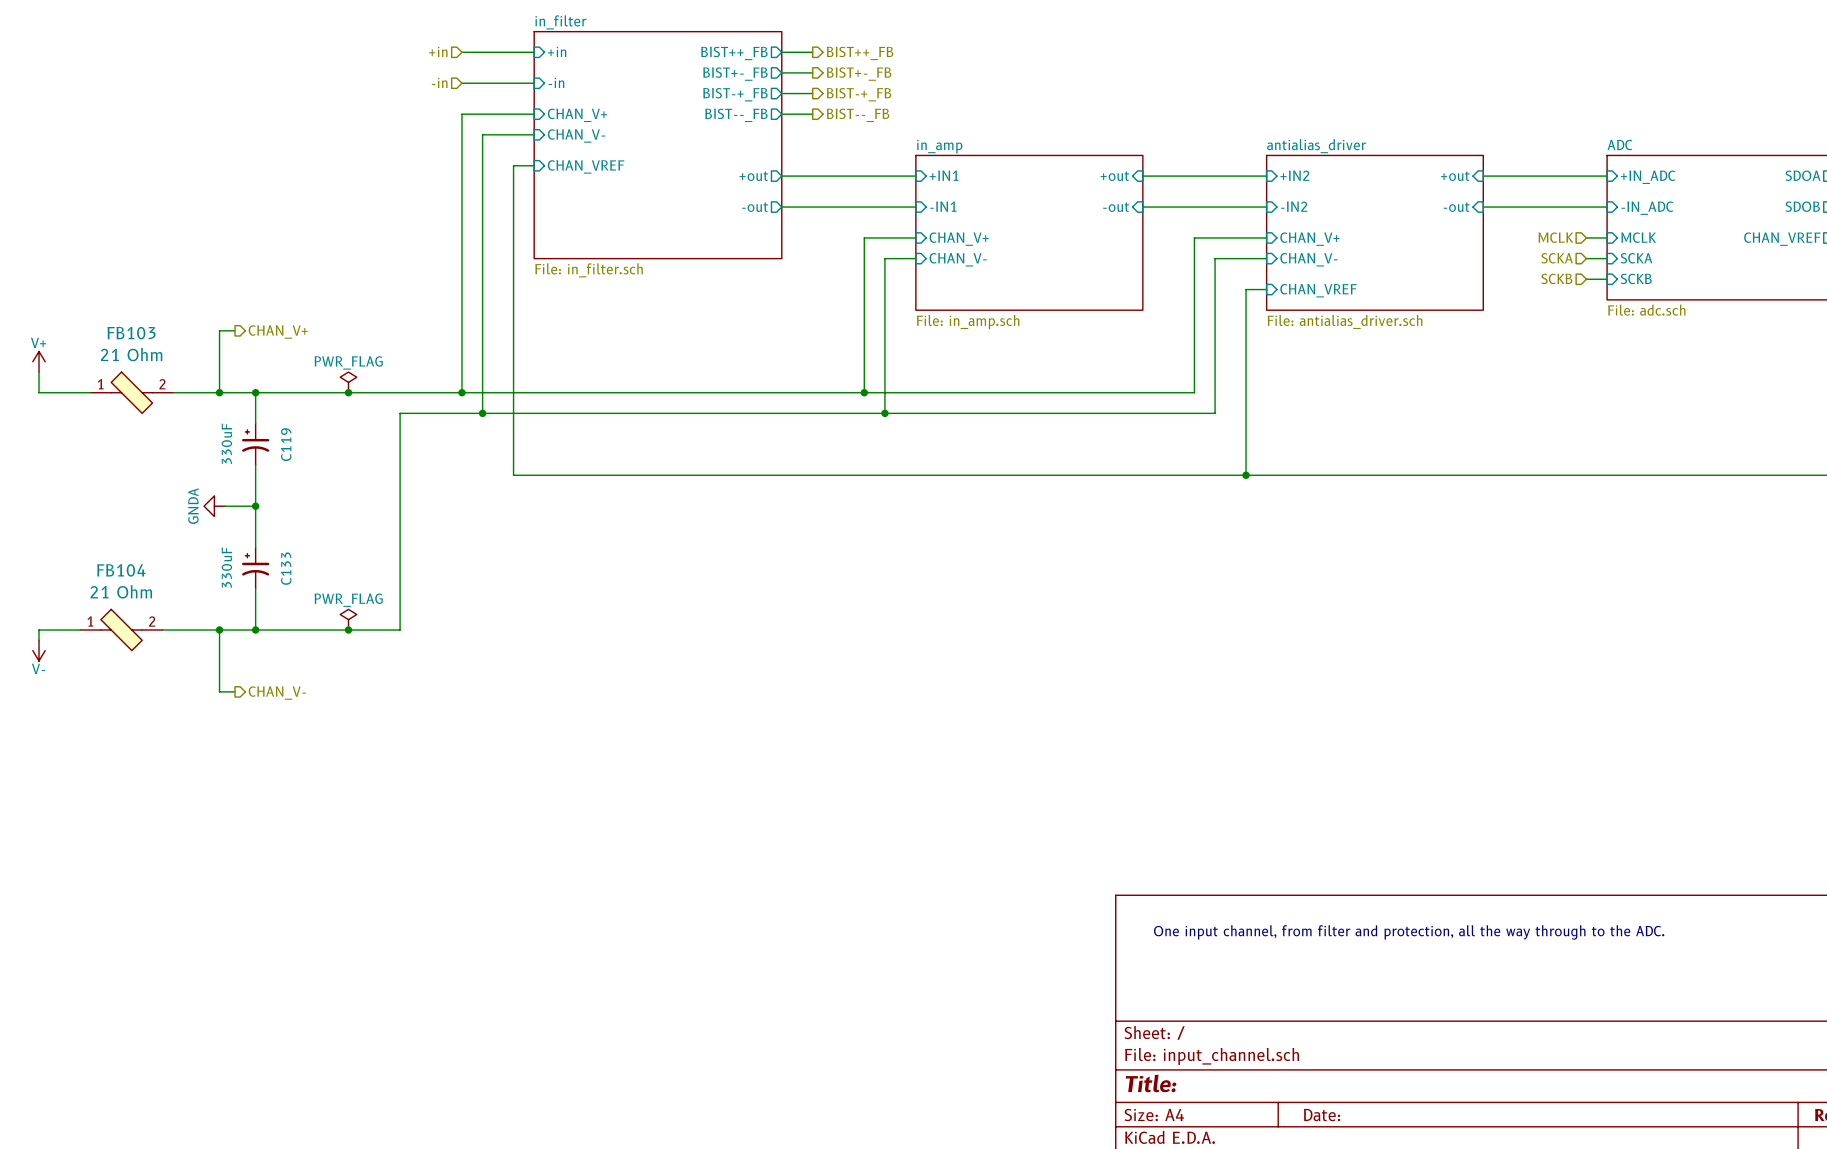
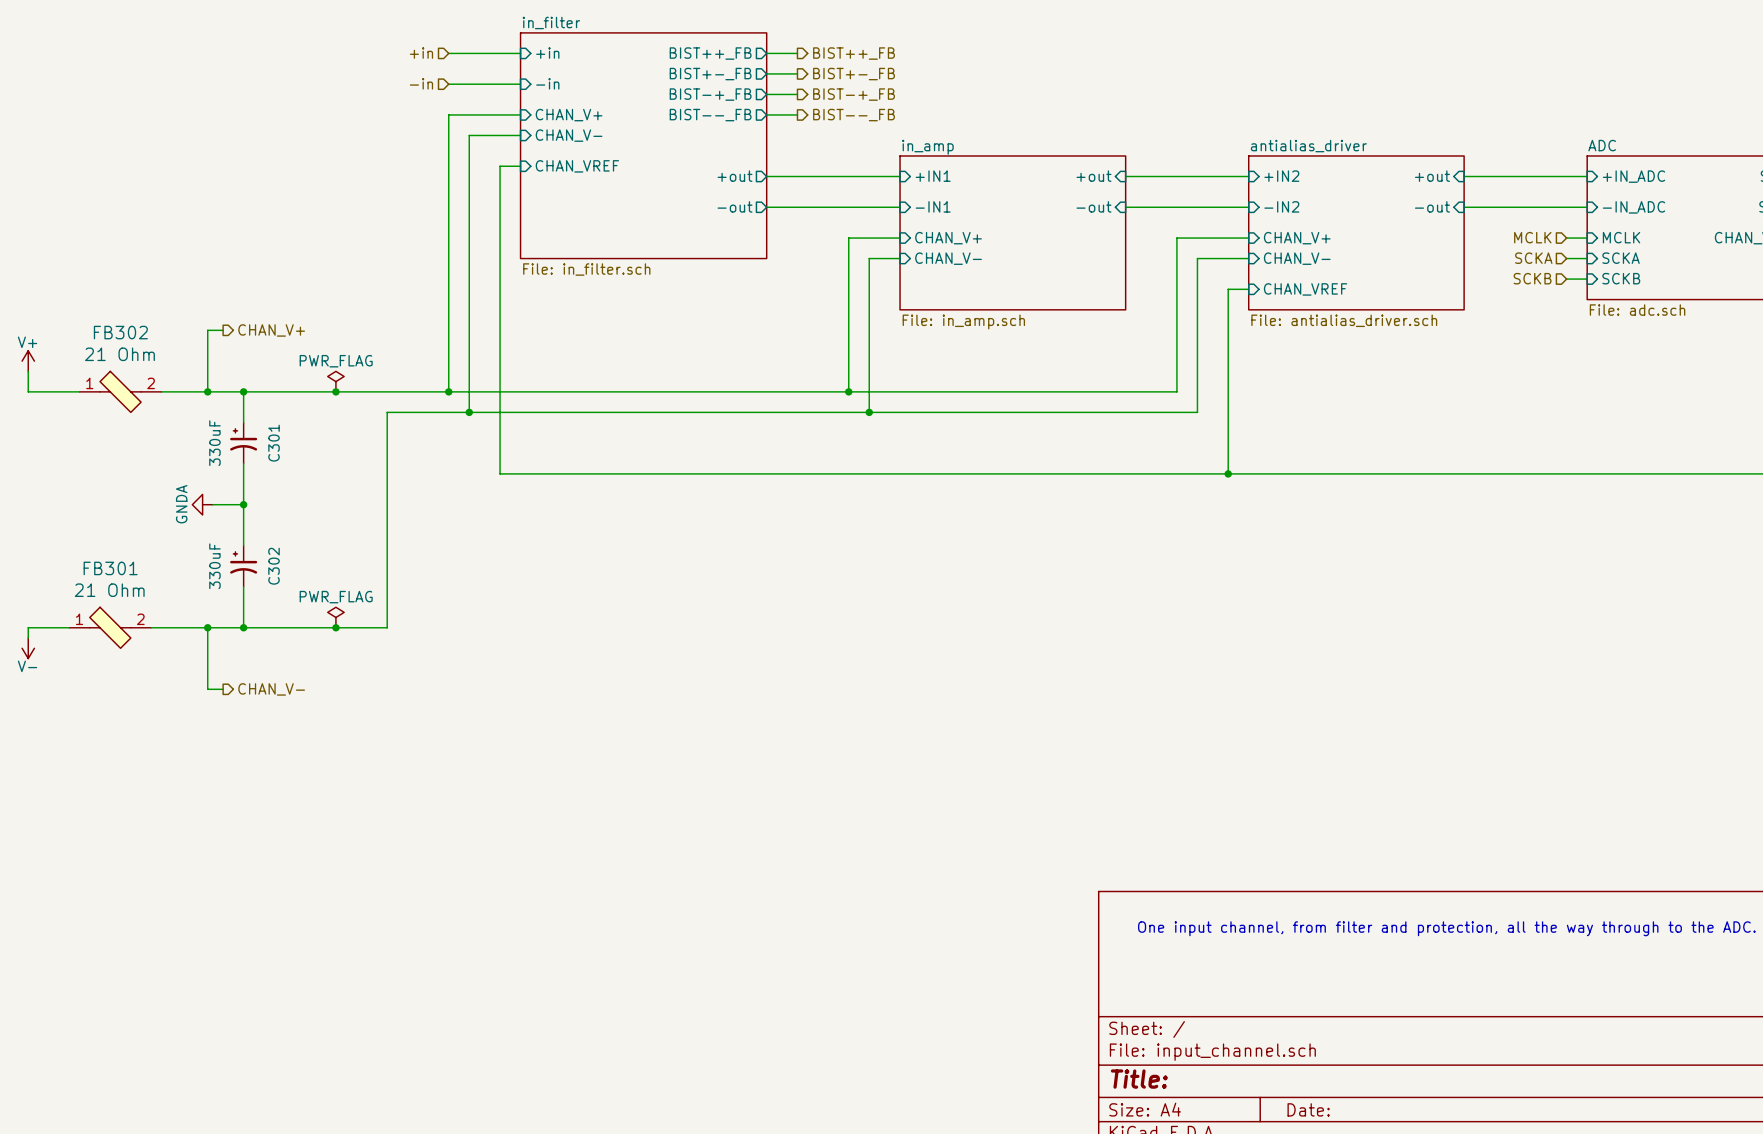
FB103 name: FB103 (131, 333) -> FB302 (120, 332)
C119 name: C119 (286, 444) -> C301 (274, 443)
C133 name: C133 (286, 568) -> C302 (274, 566)
FB104 name: FB104 (121, 570) -> FB301 (110, 568)

